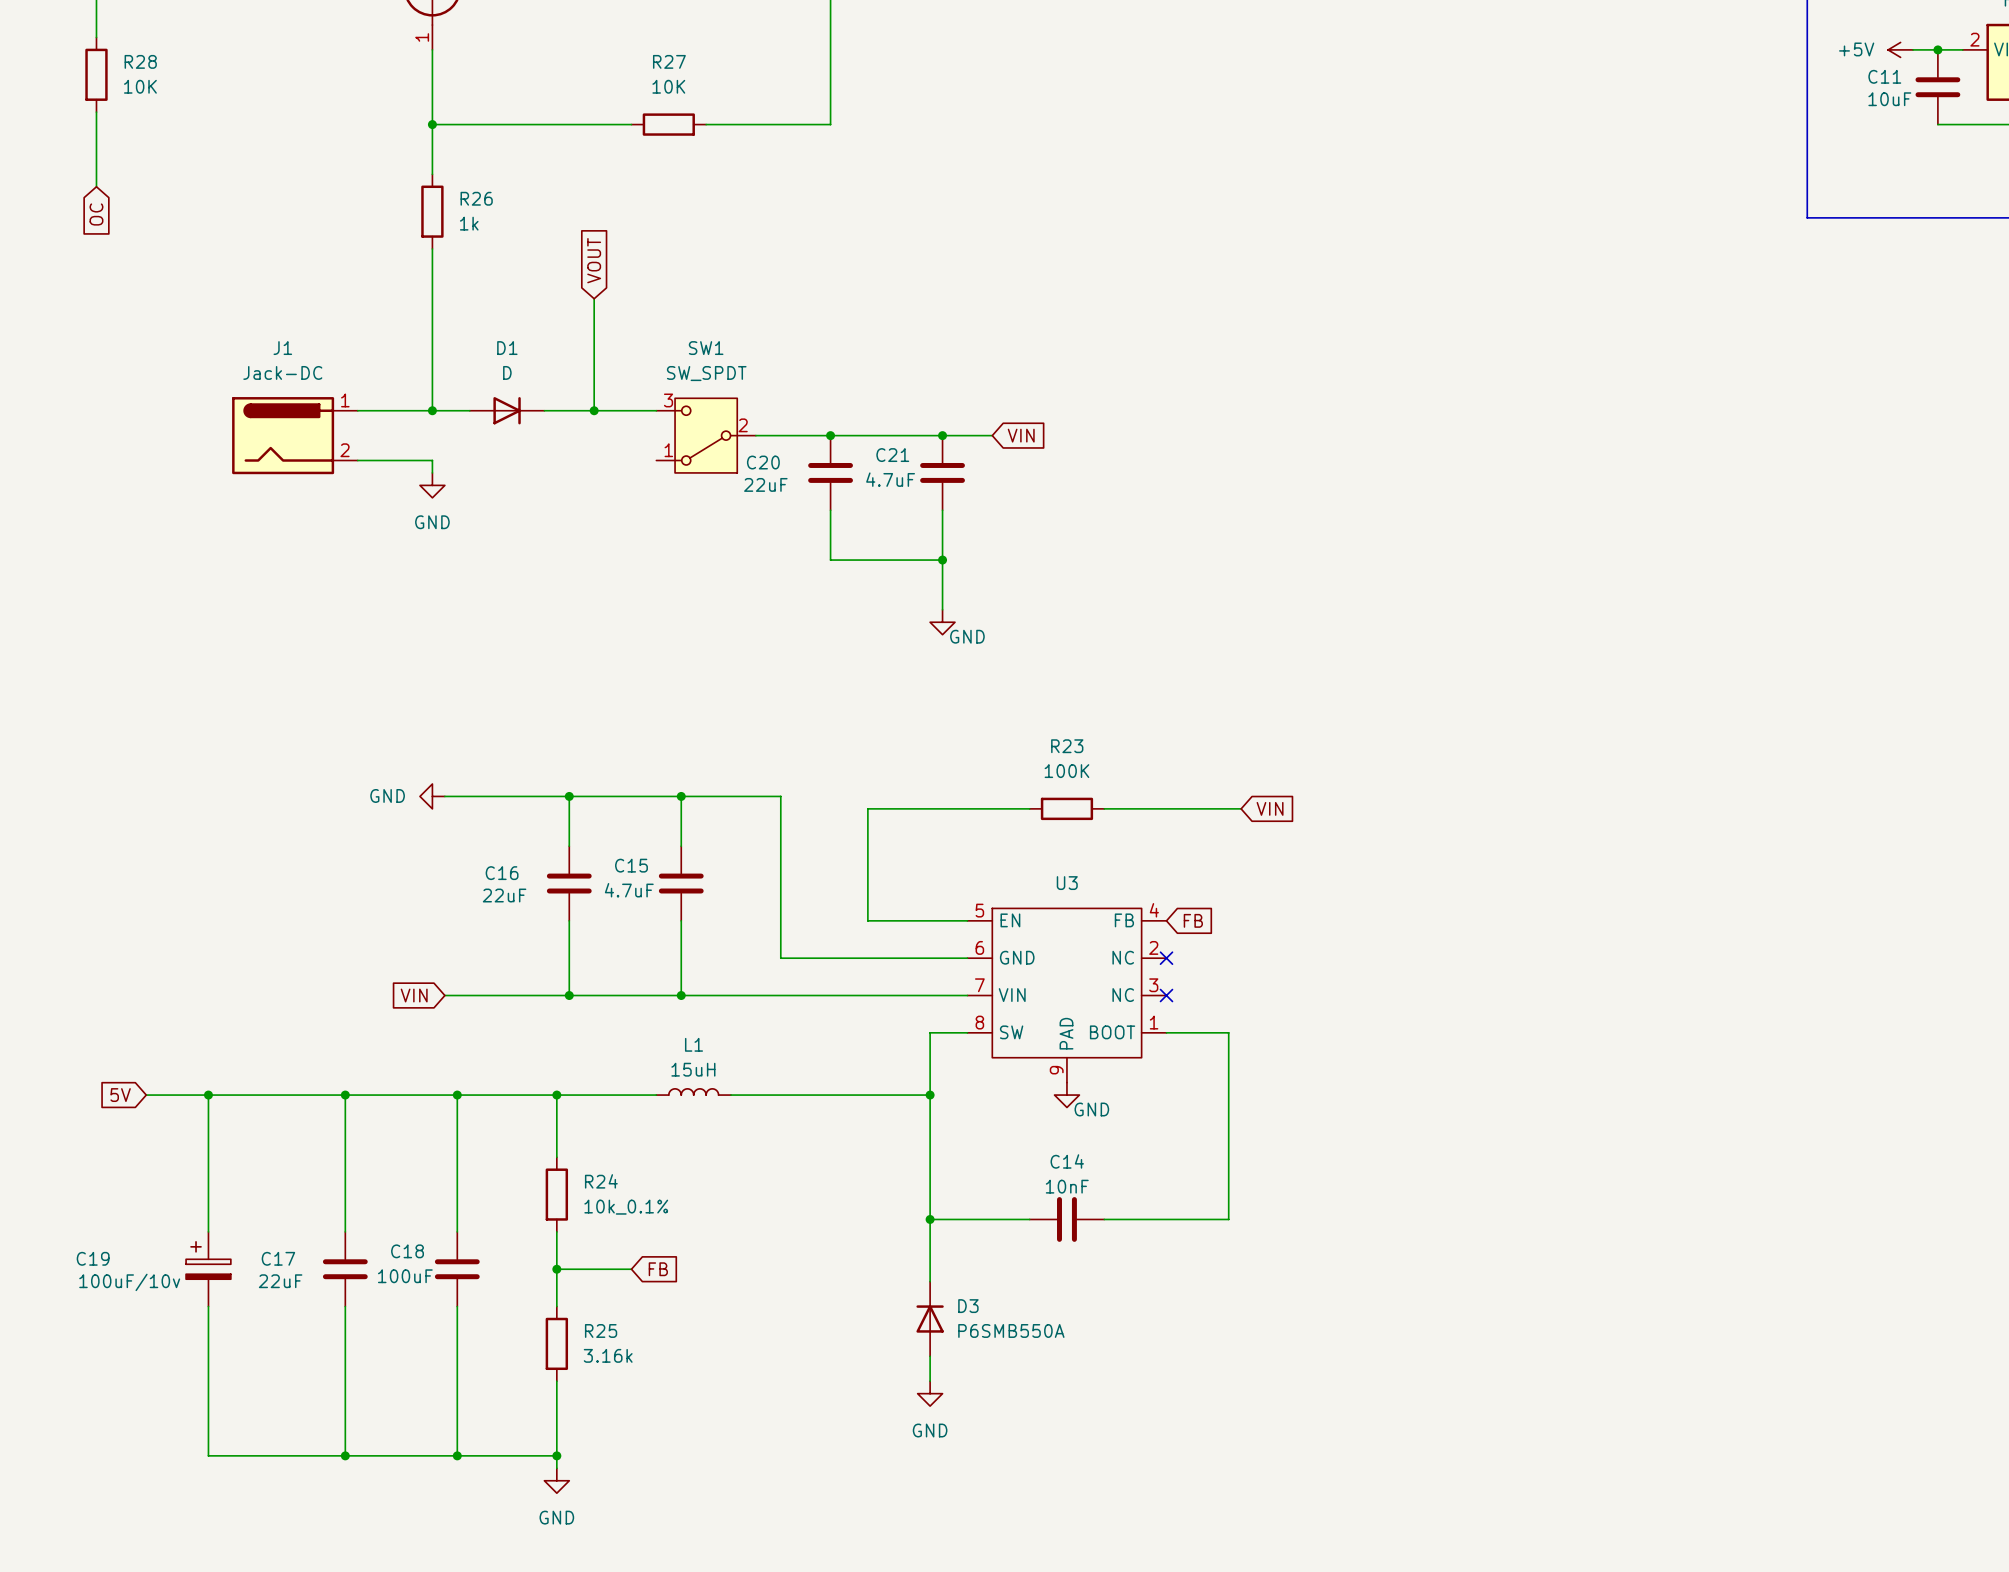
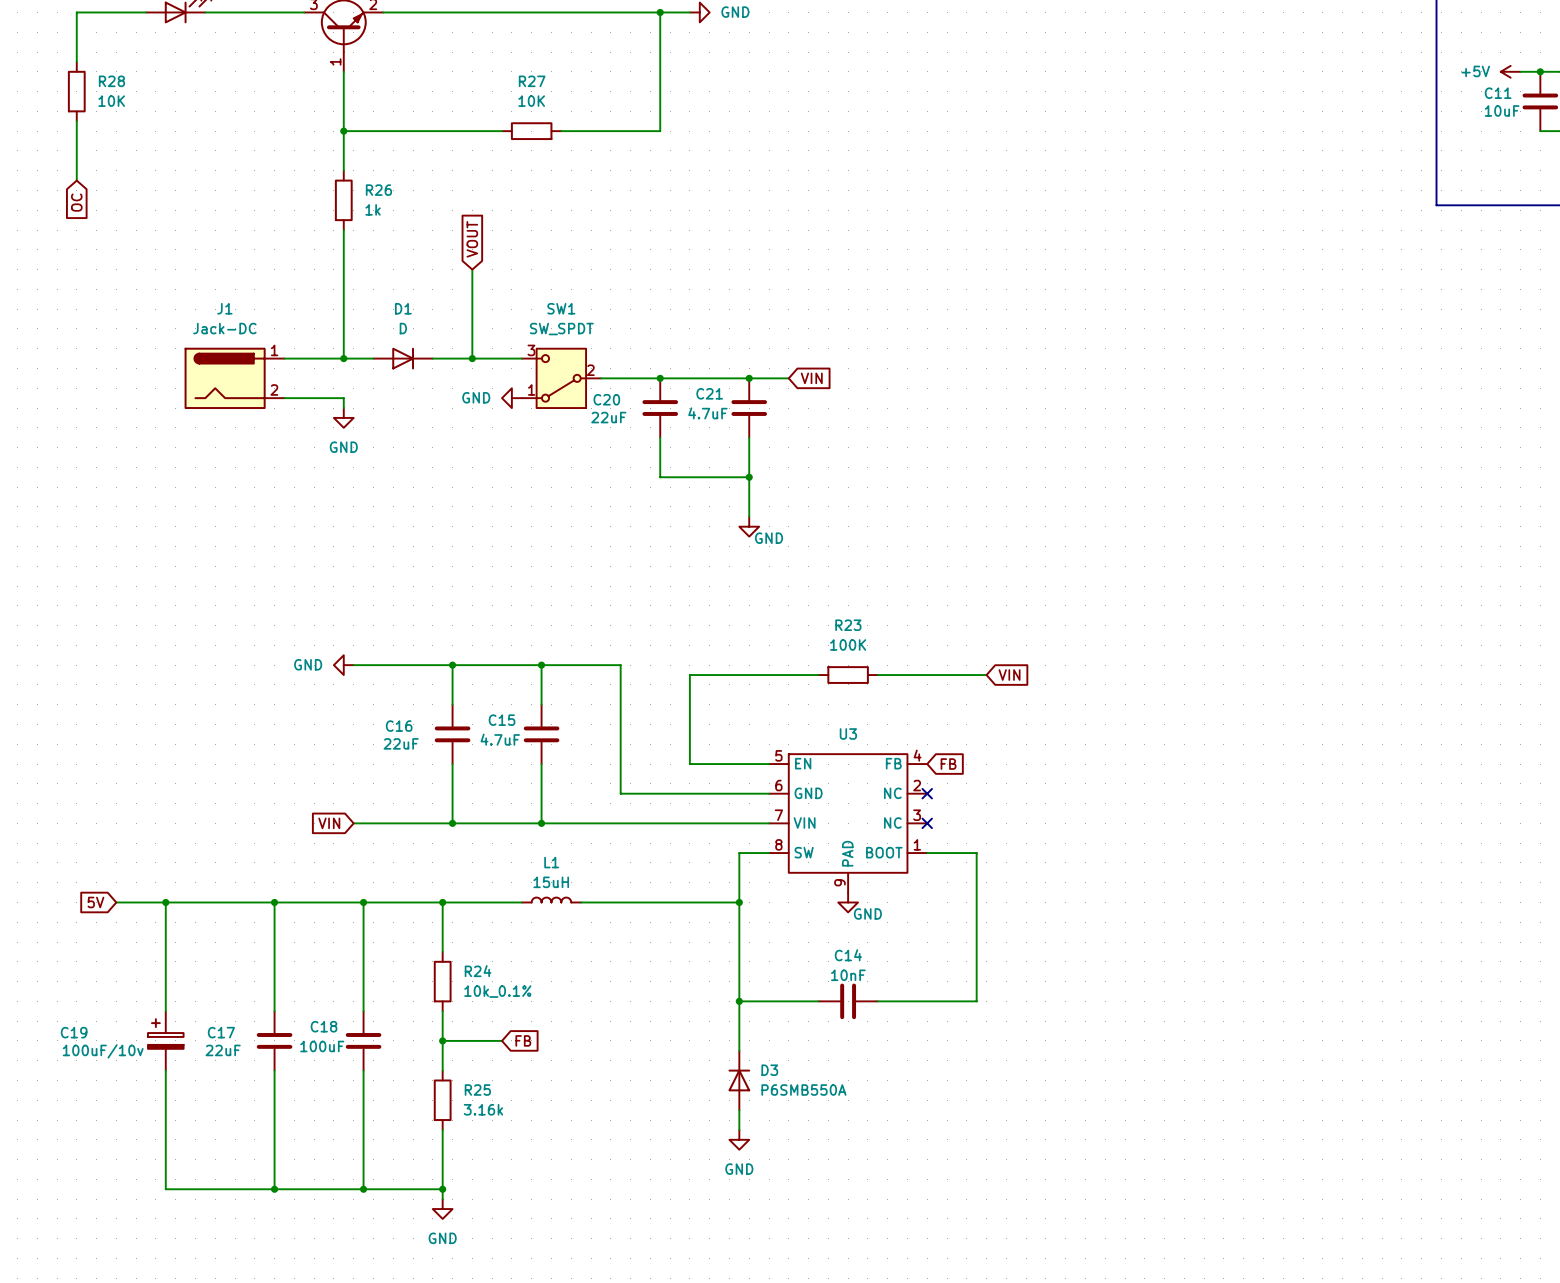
power symbol: none -> GND (511, 398)

